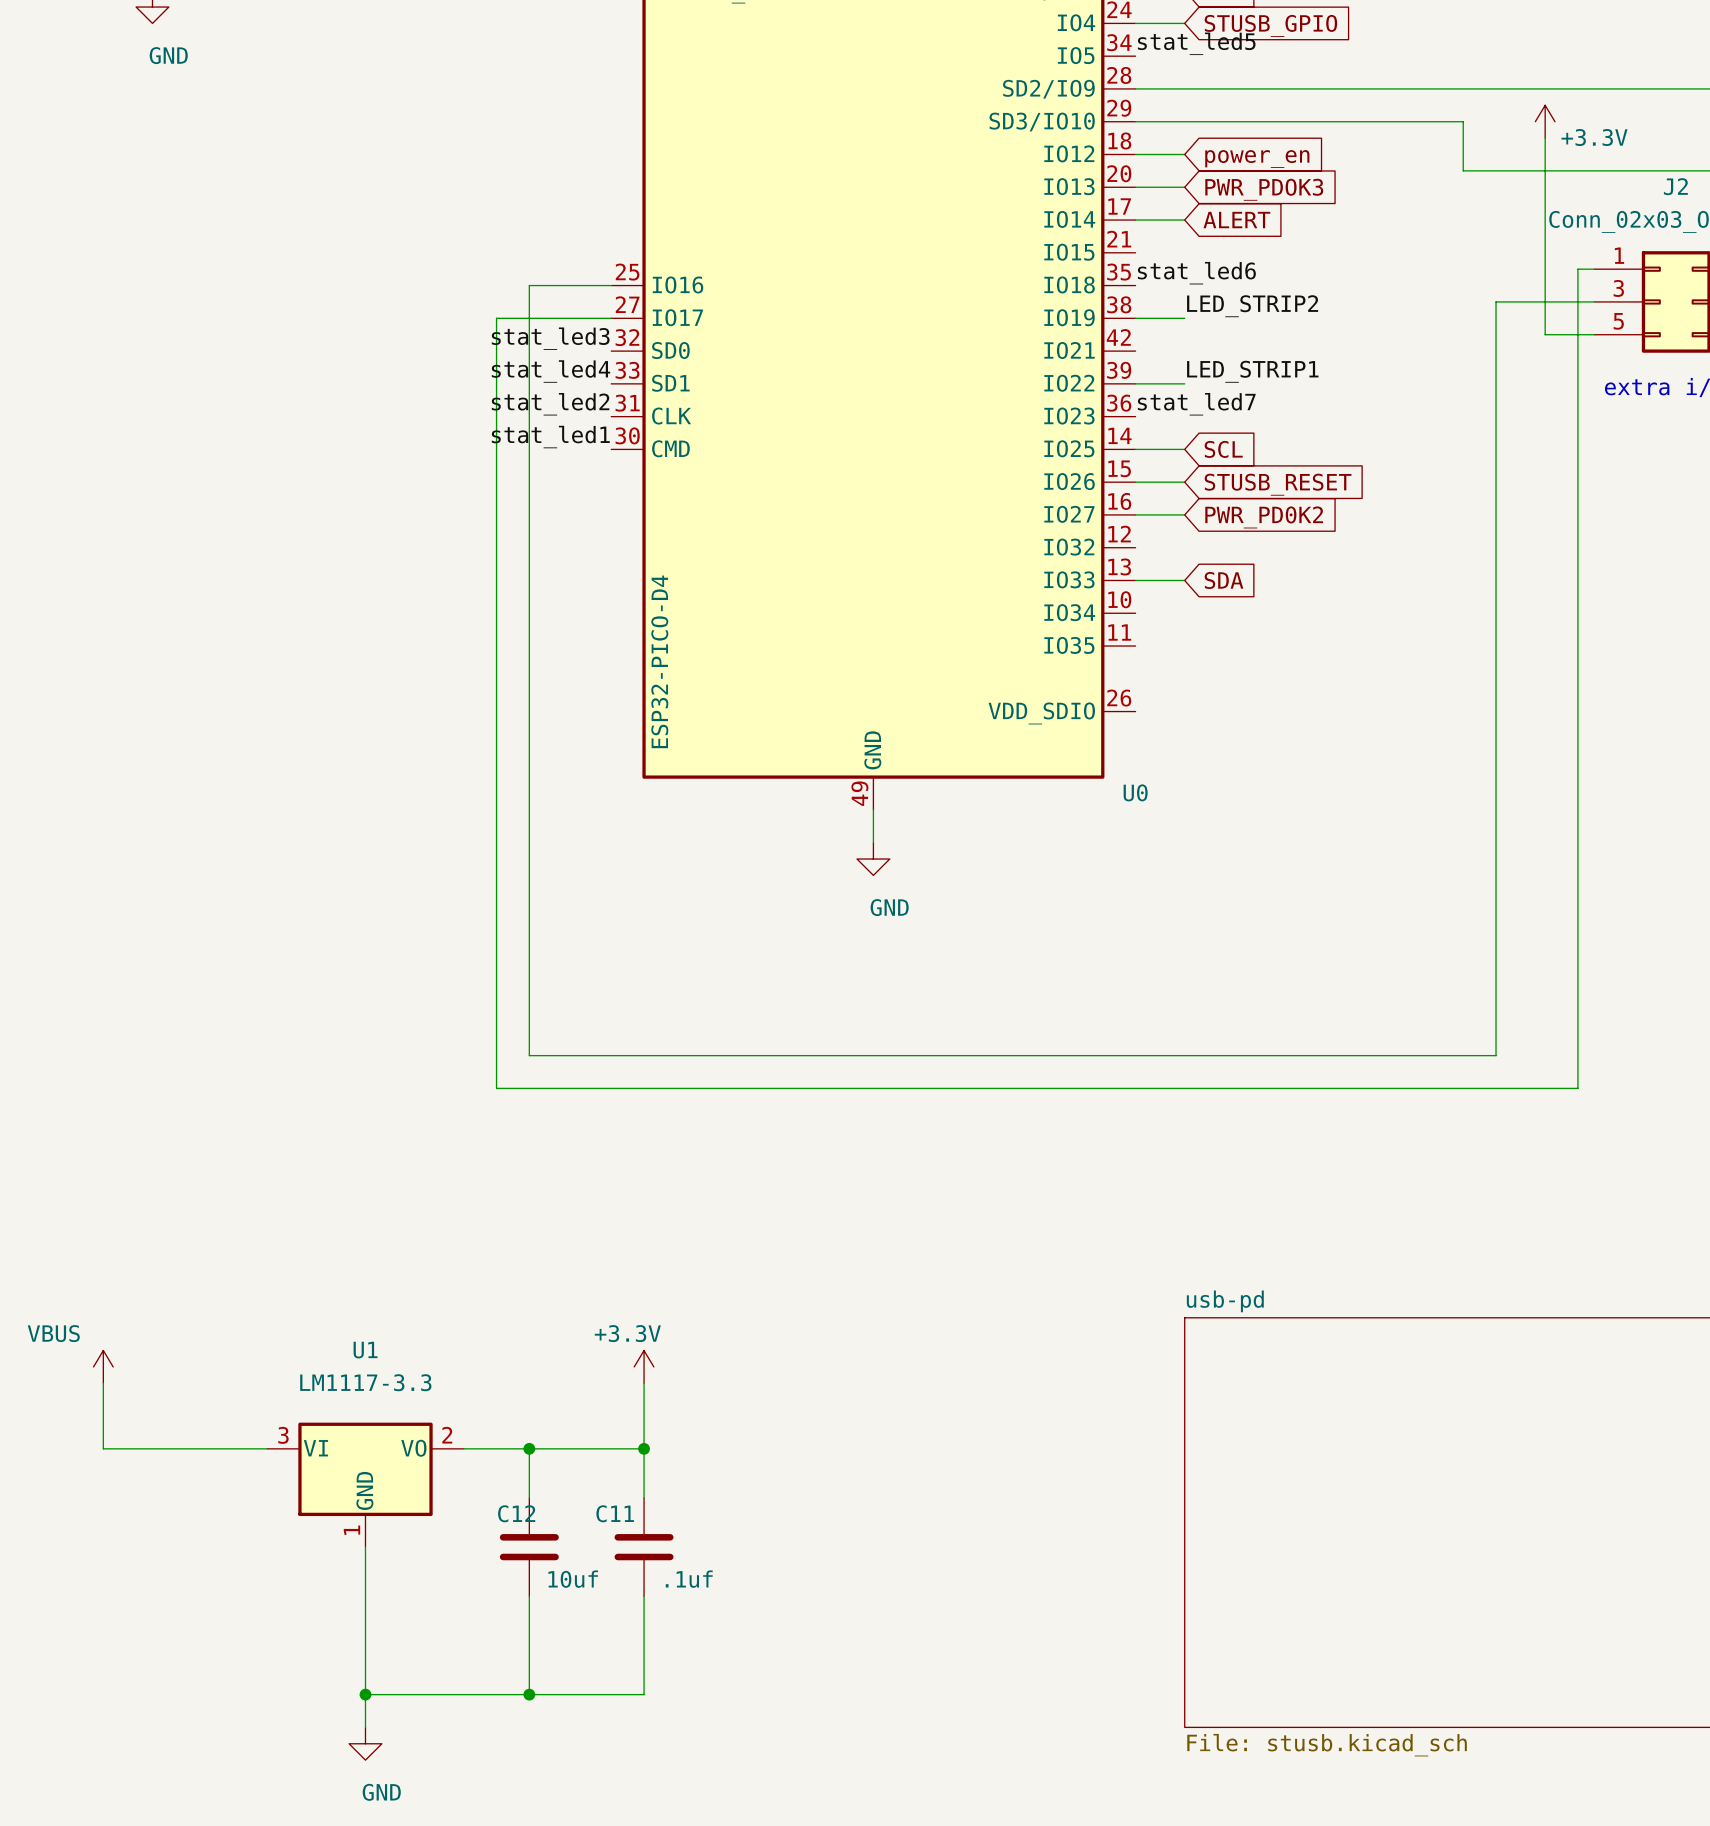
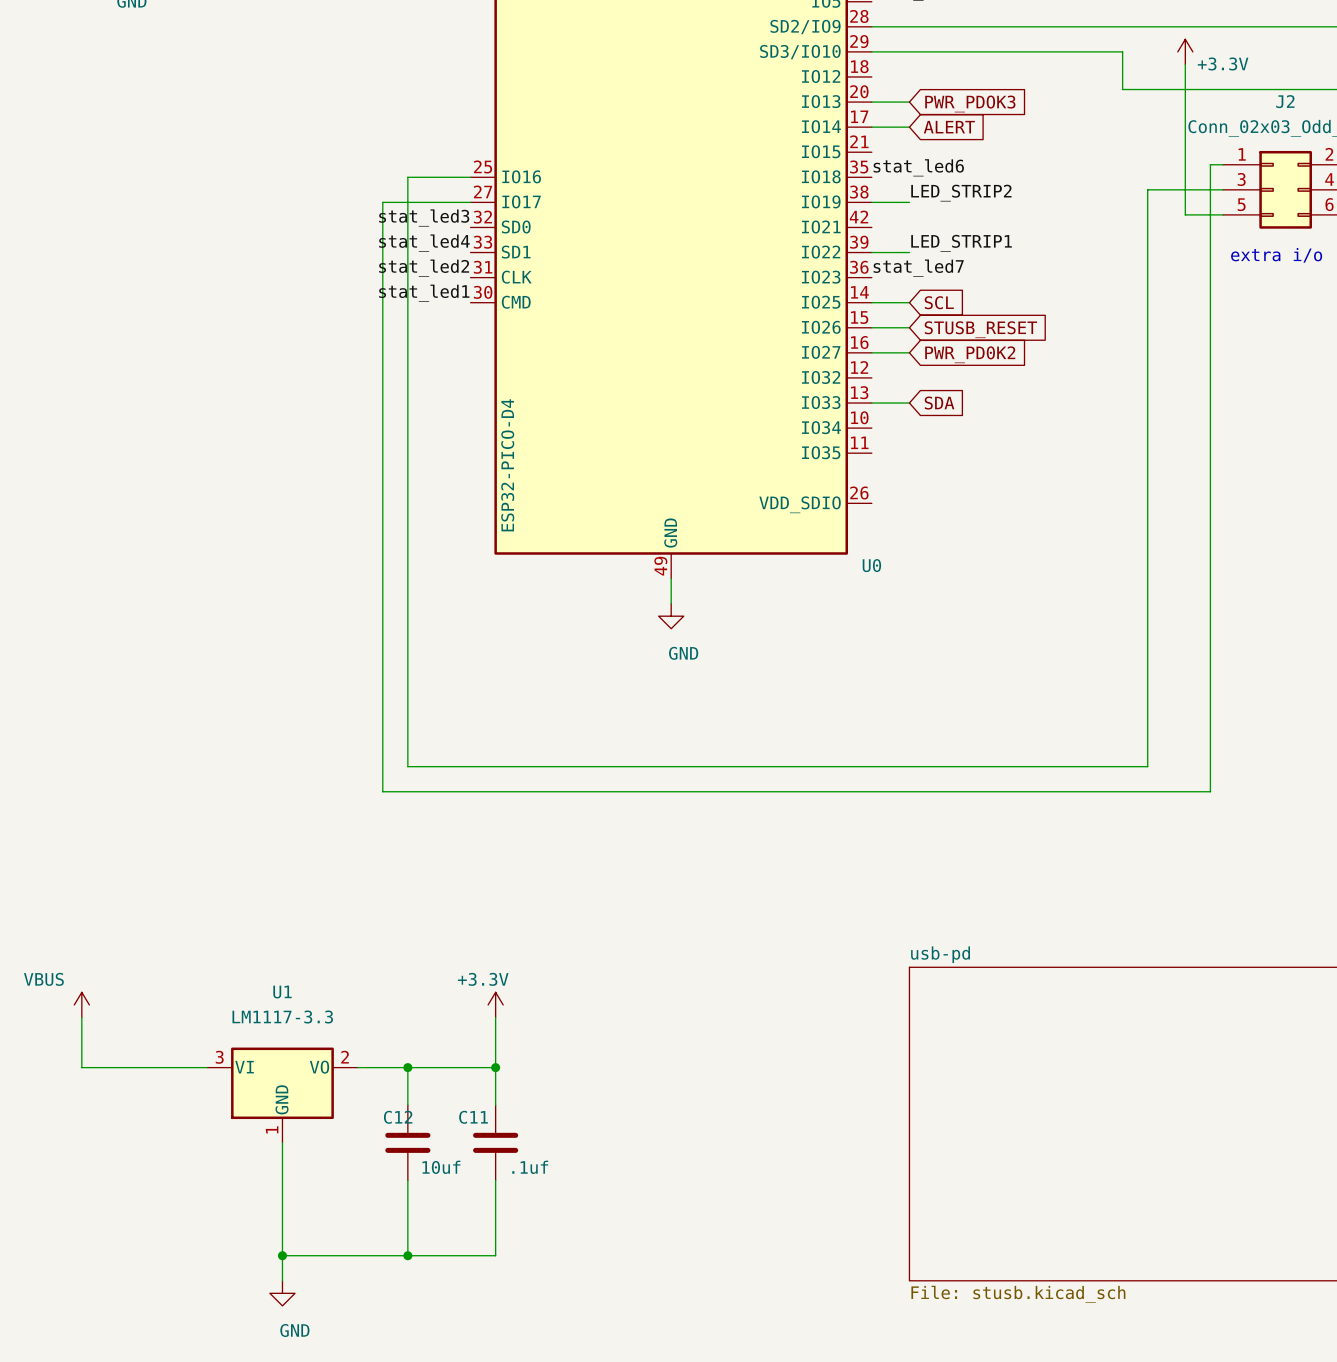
wire: (1135, 154) (1184, 154) -> none
global label: power_en (1257, 159) -> none

